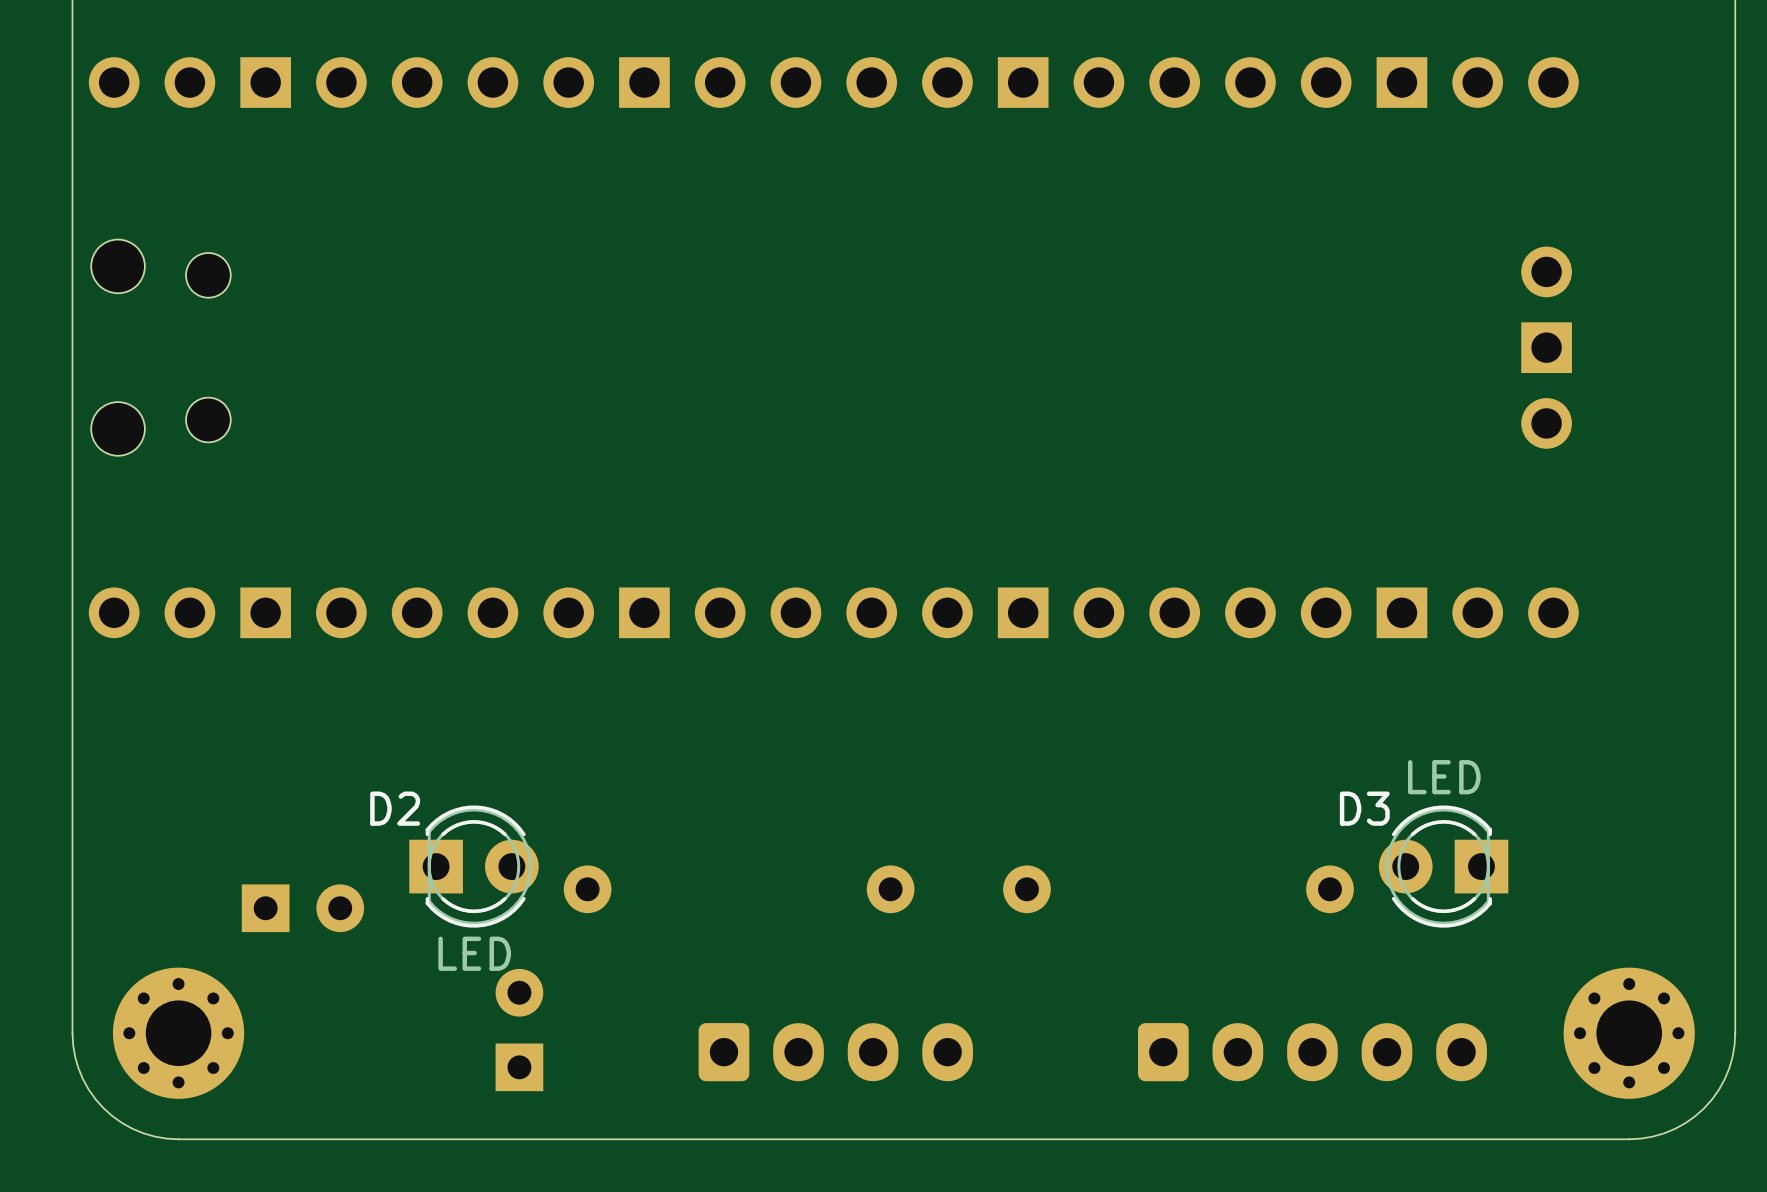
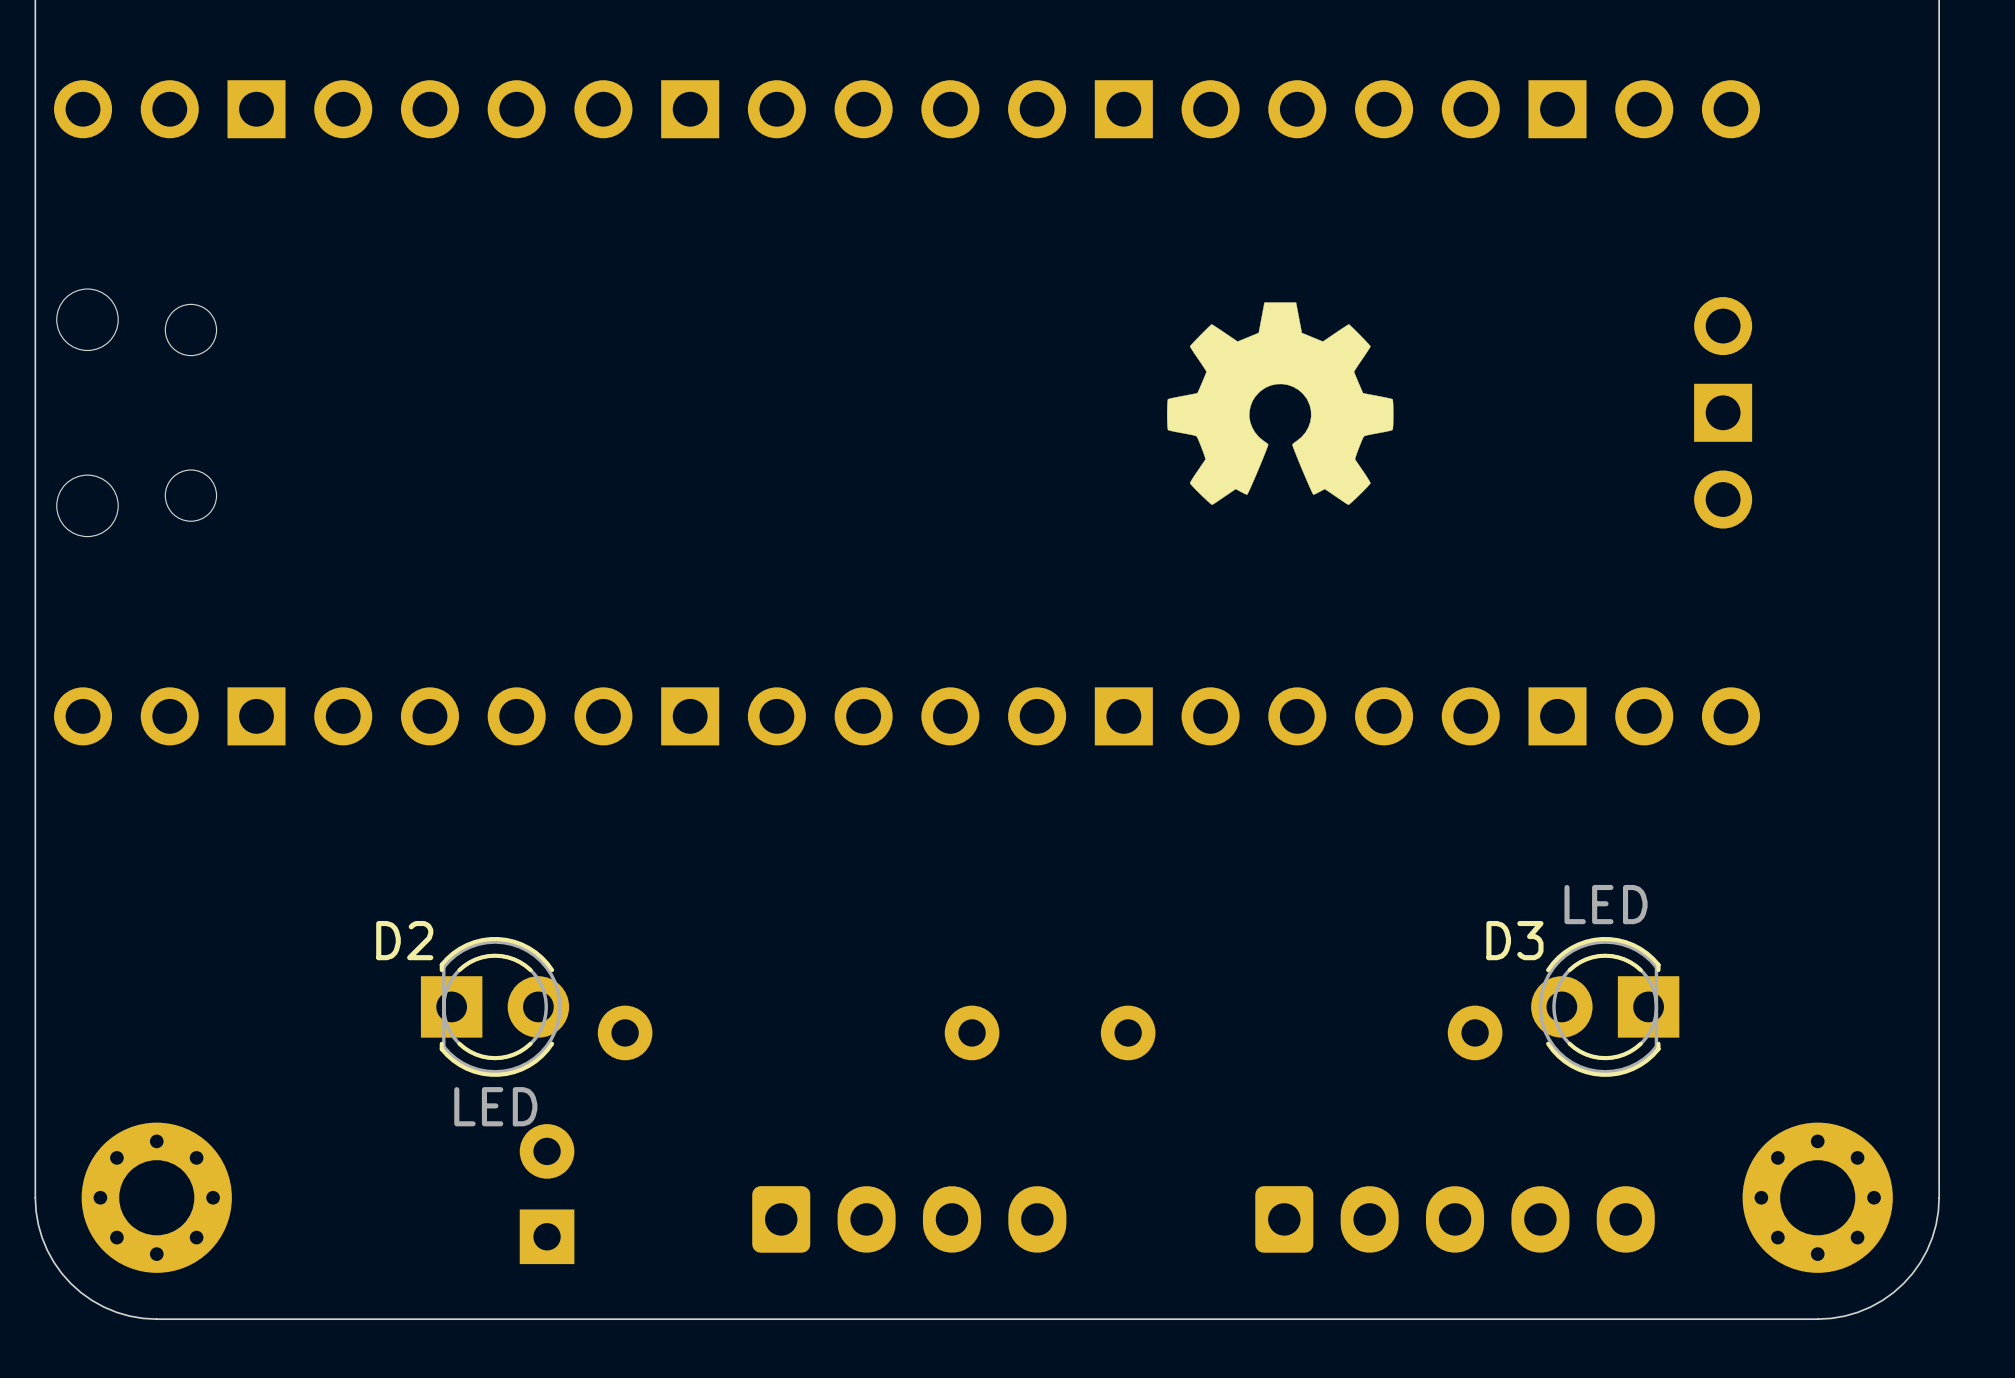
drawing: none -> [1167, 302, 1394, 505]
part: (302, 908) -> none

